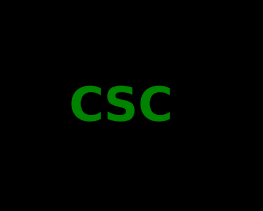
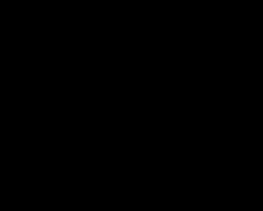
text: CSC (120, 103) -> none

